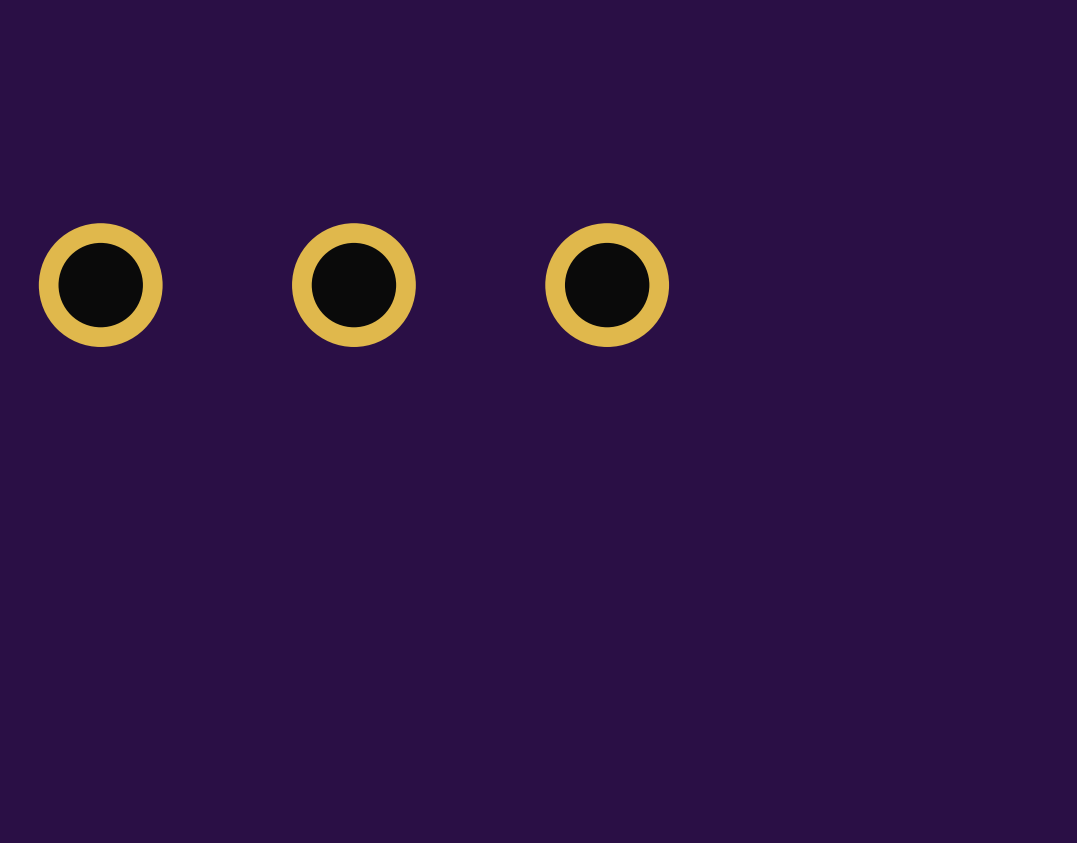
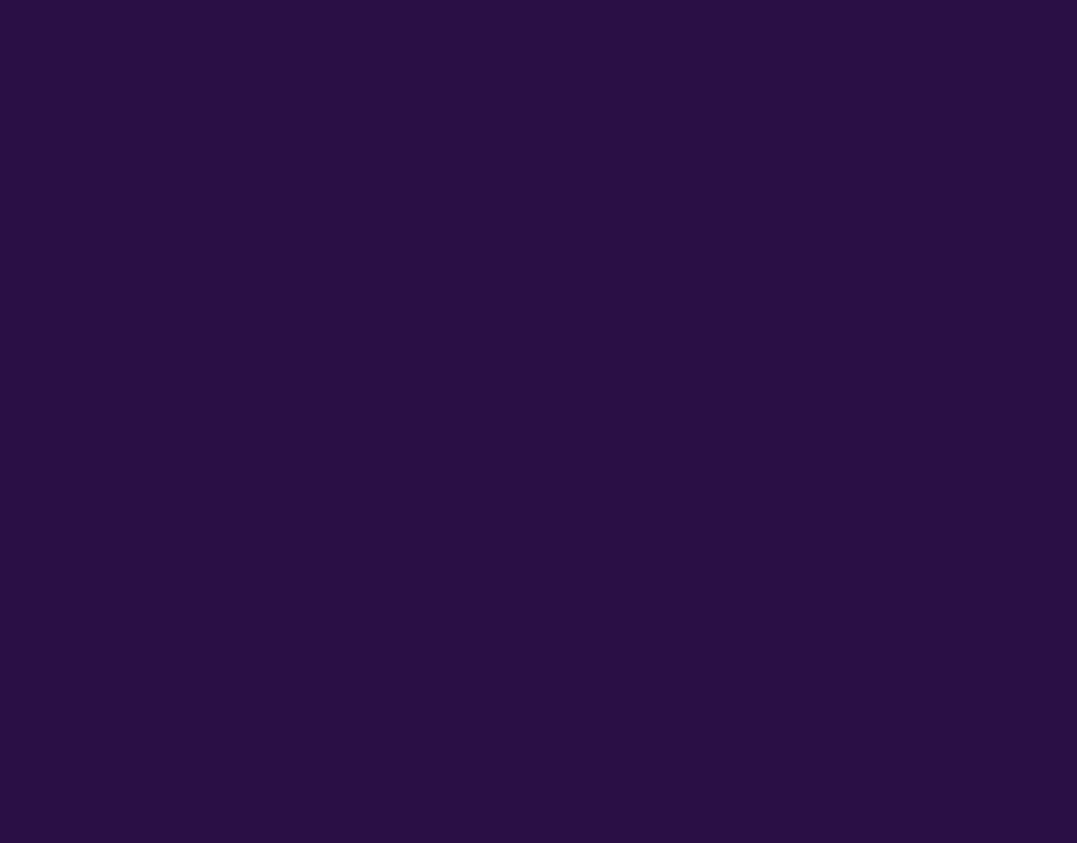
part: (353, 285) -> none

